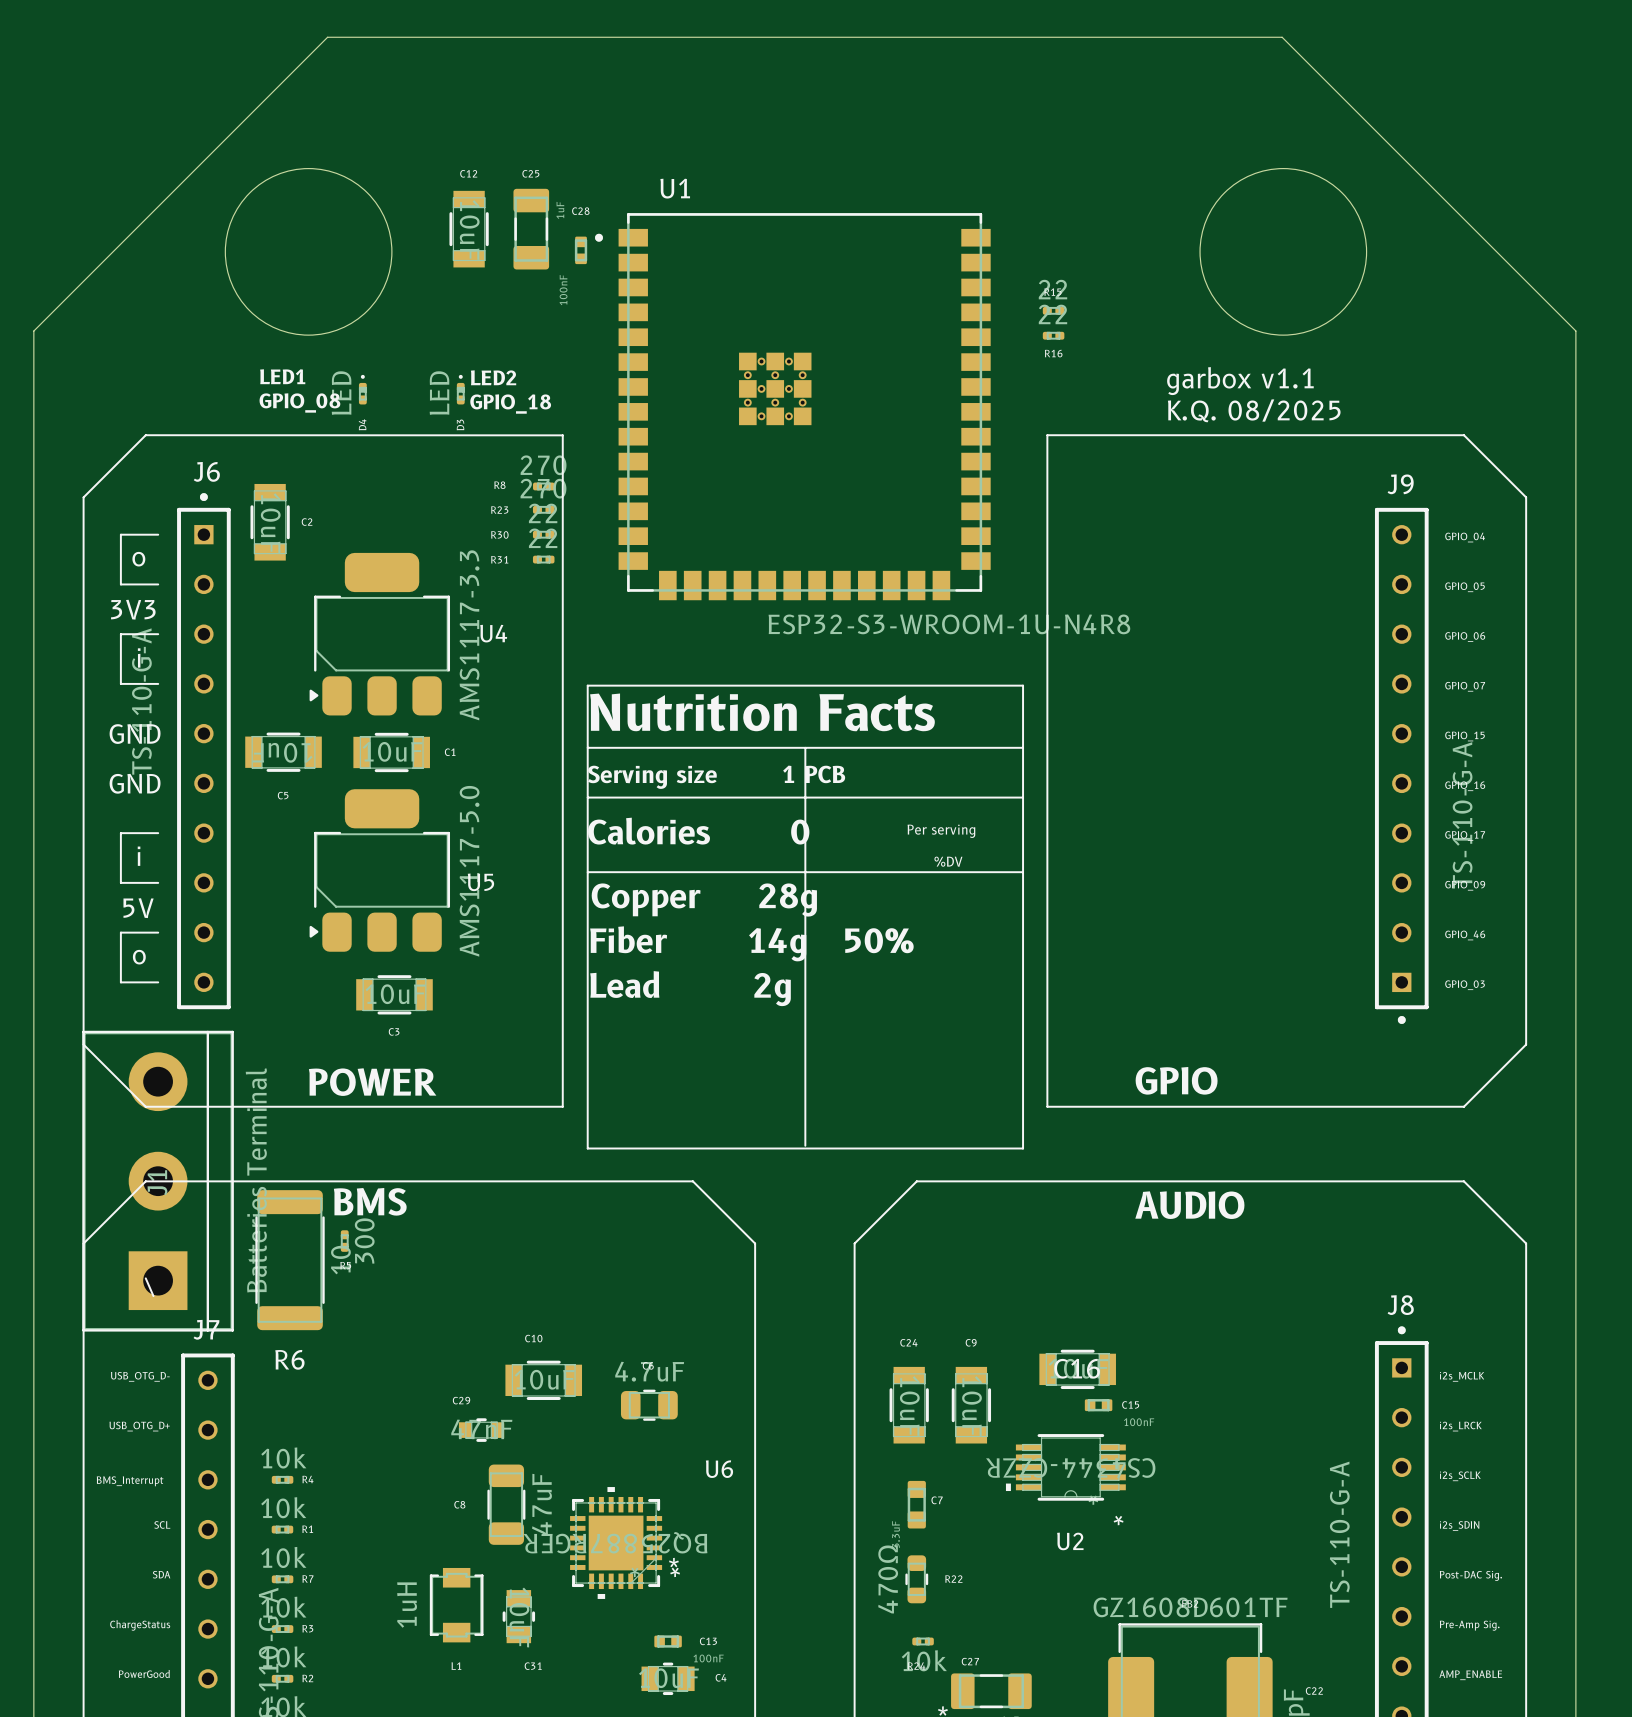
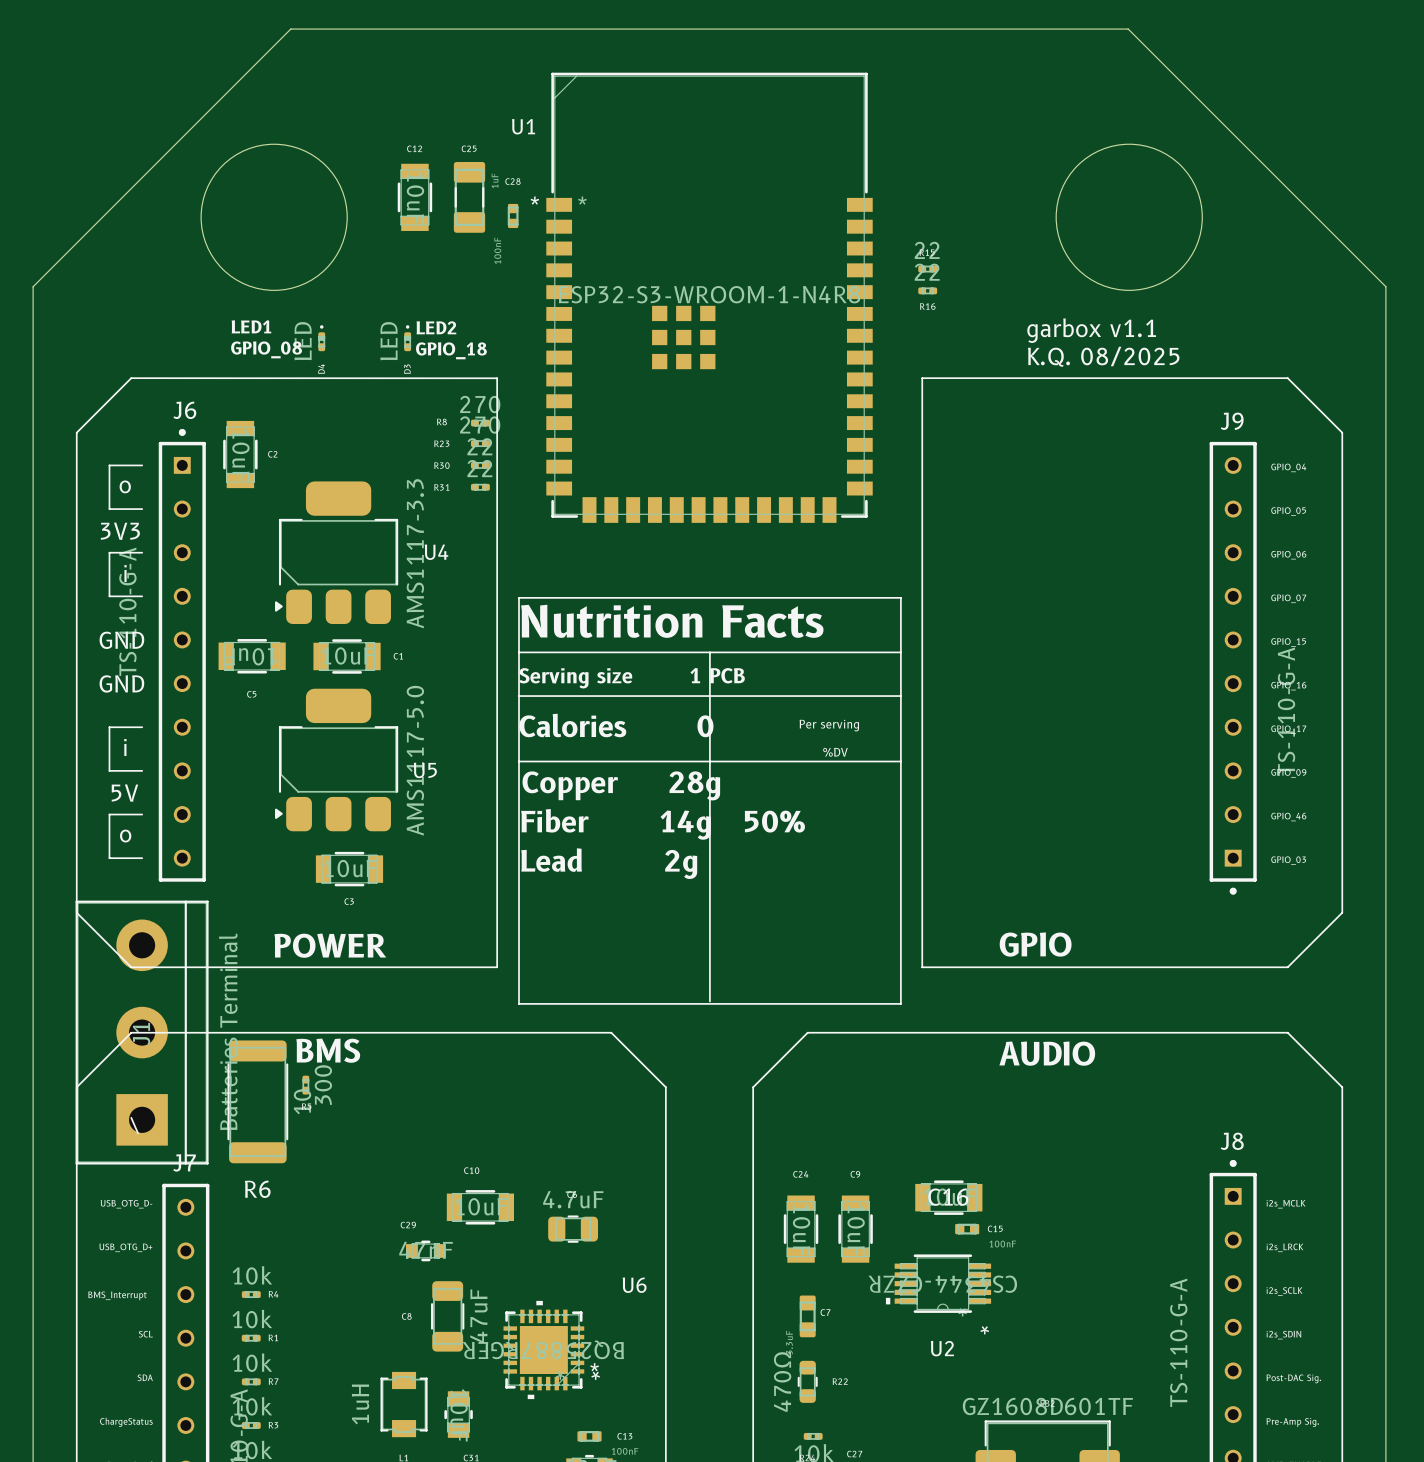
U1 name position: U1 (675, 188) -> U1 (523, 126)
U1 footprint: [595, 213, 991, 601] -> [546, 72, 873, 523]
U1 value: ESP32-S3-WROOM-1U-N4R8 (949, 624) -> ESP32-S3-WROOM-1-N4R8 (709, 294)

